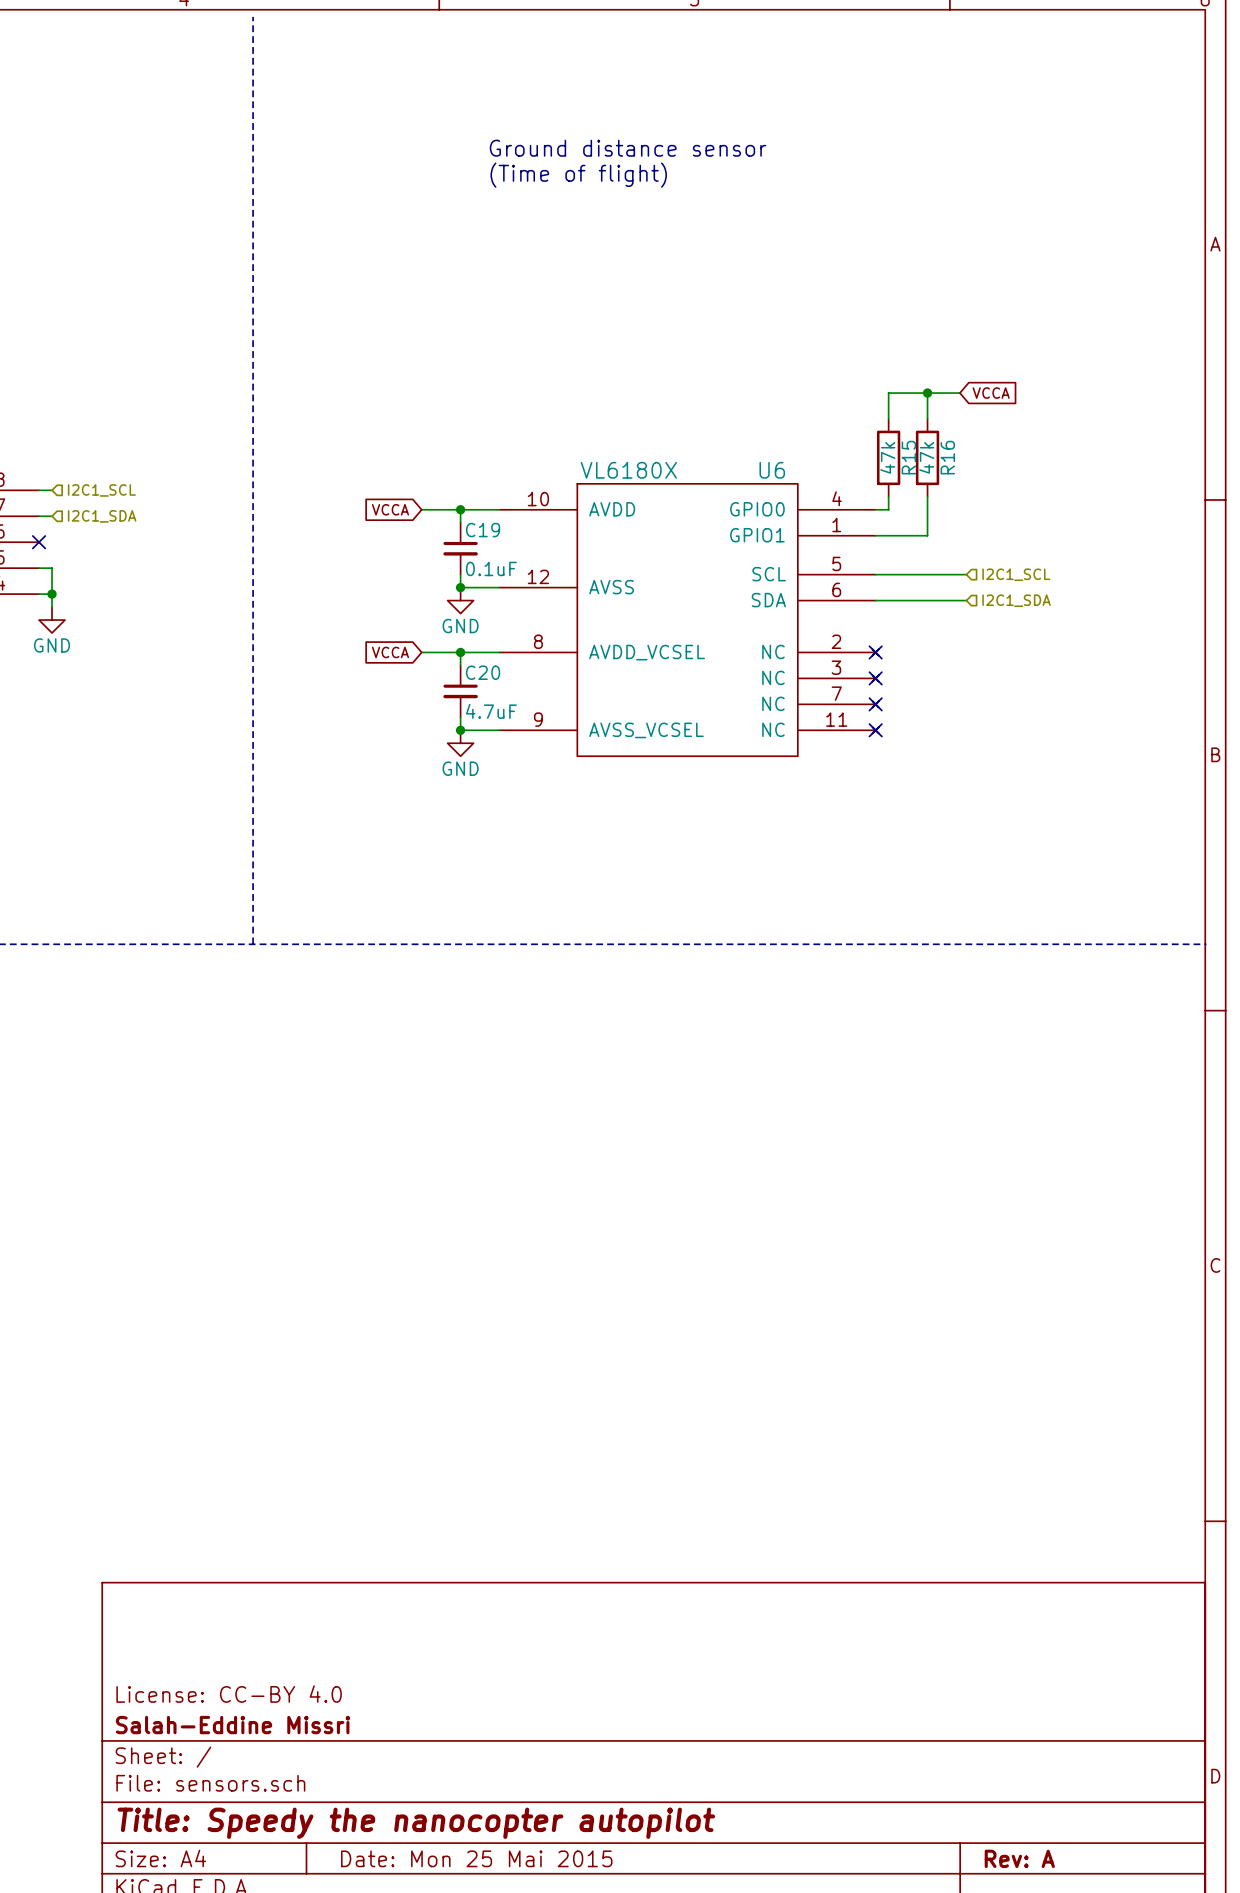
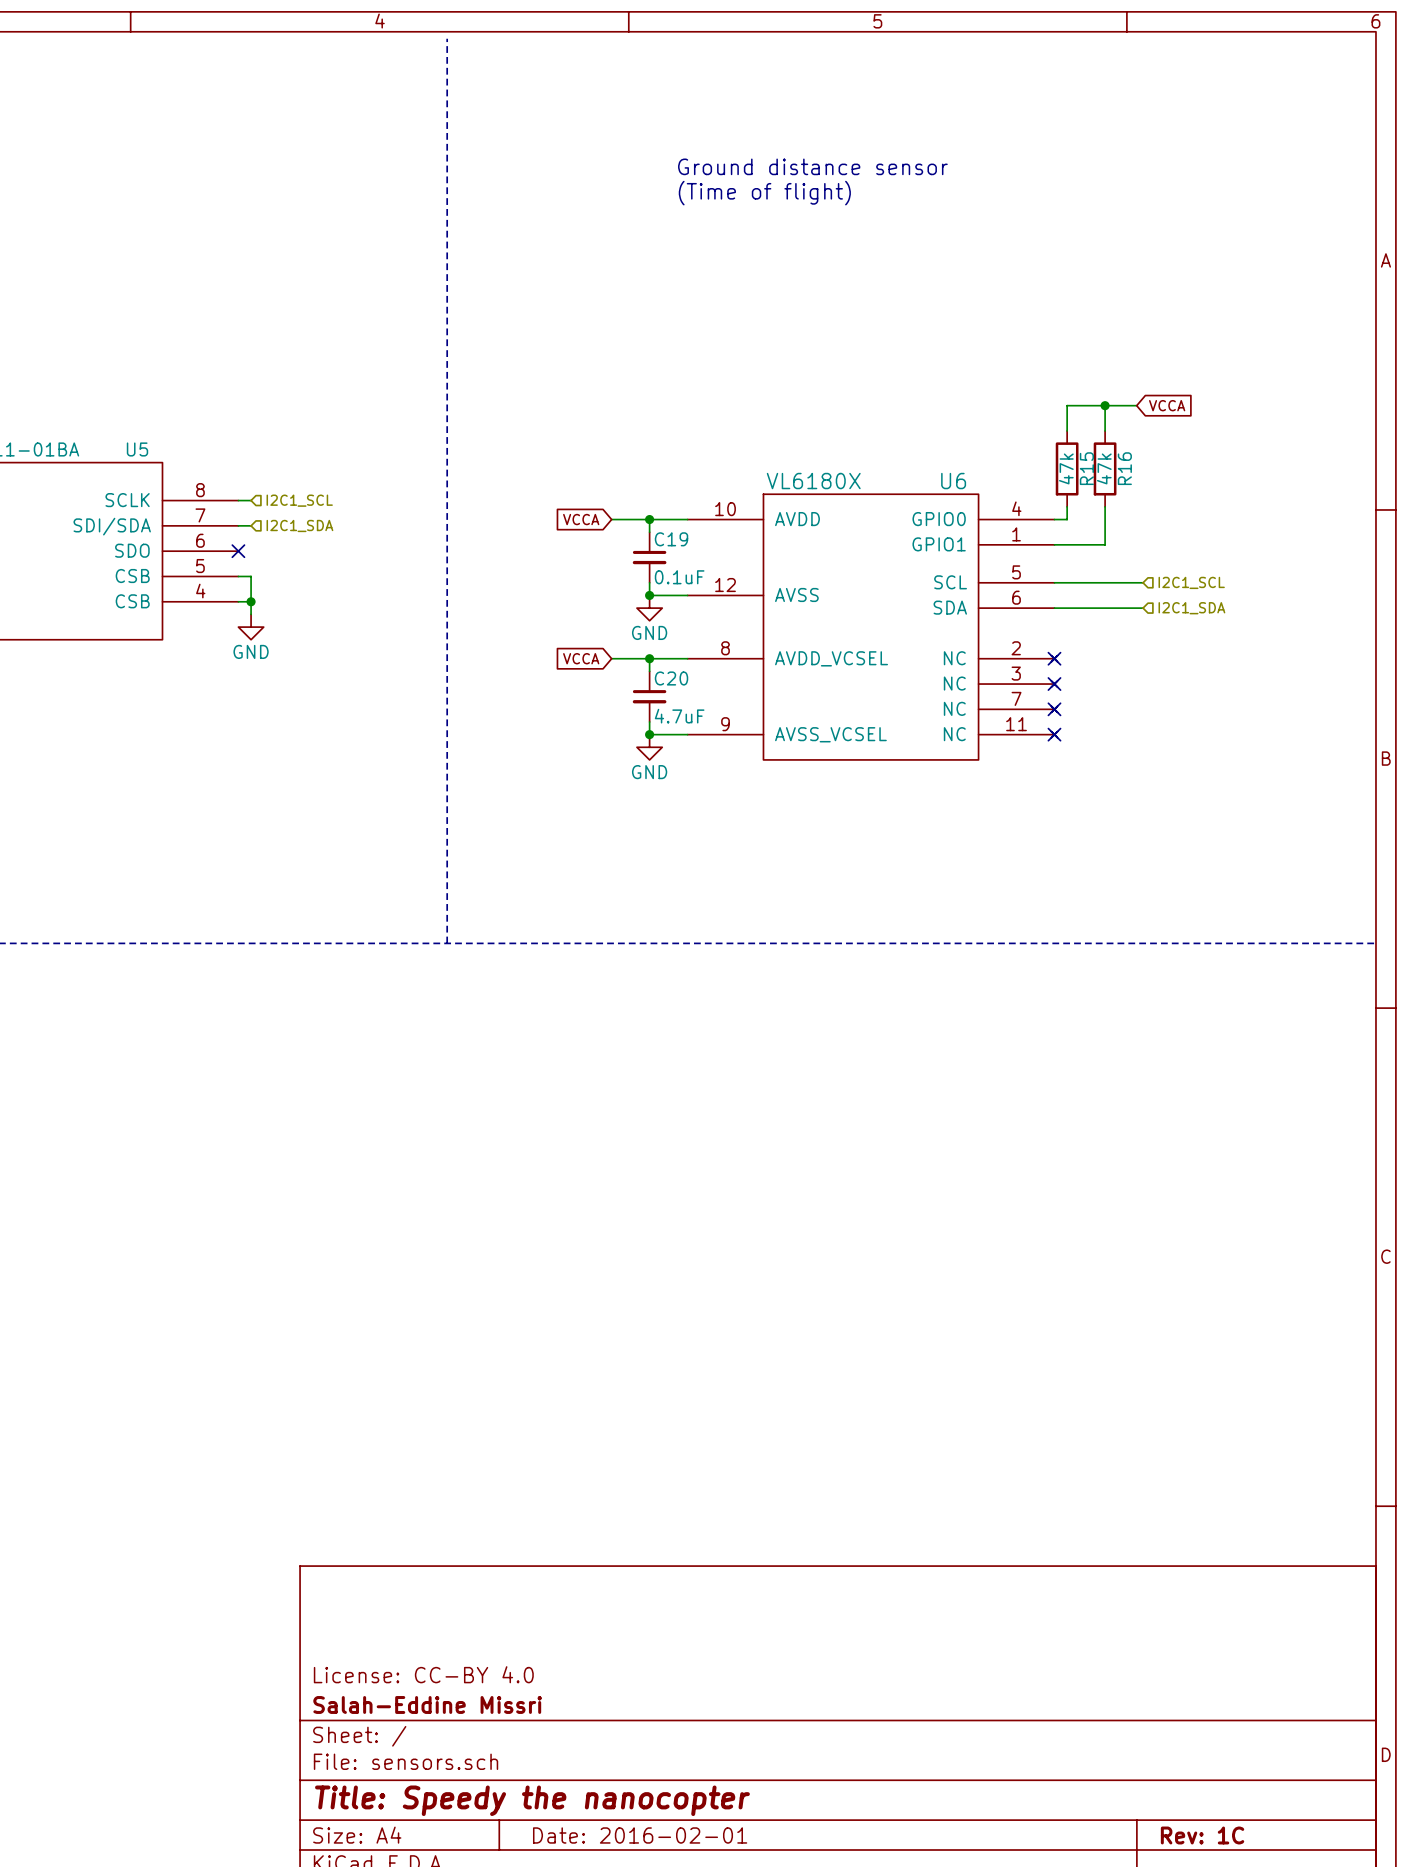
title block: Title: Speedy the nanocopter autopilot (416, 1823) -> Title: Speedy the nanocopter (532, 1800)
title block: Date: Mon 25 Mai 2015 (476, 1858) -> Date: 2016-02-01 (640, 1835)
title block: Rev: A (1019, 1858) -> Rev: 1C (1202, 1835)

